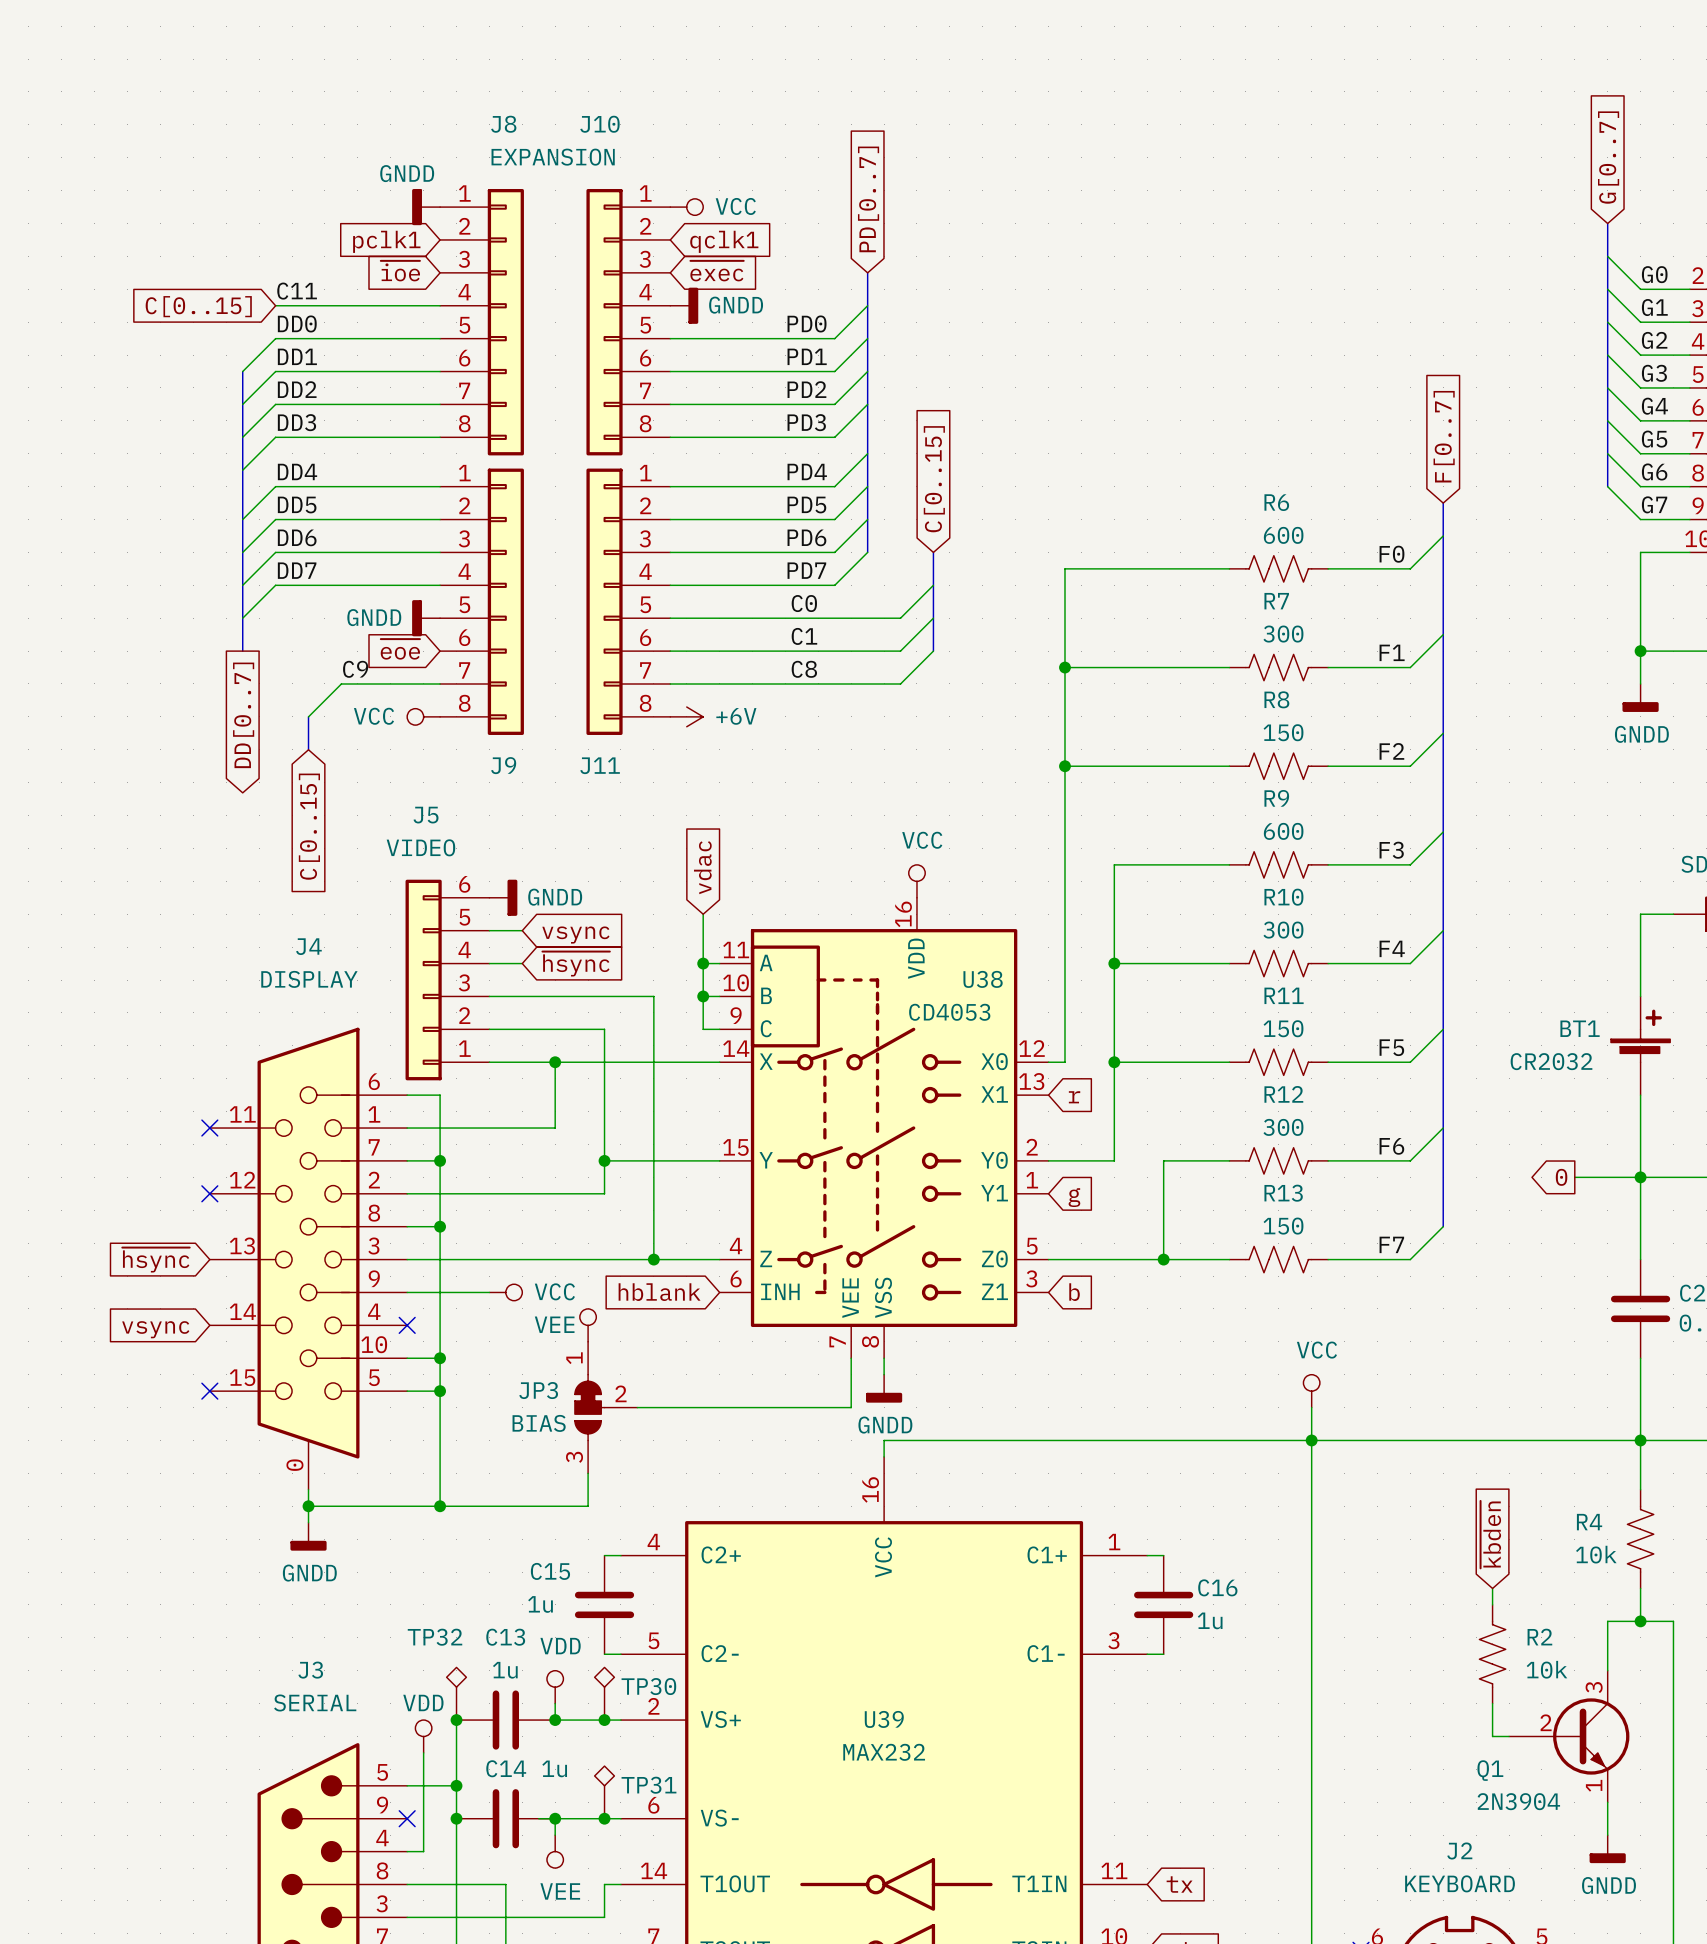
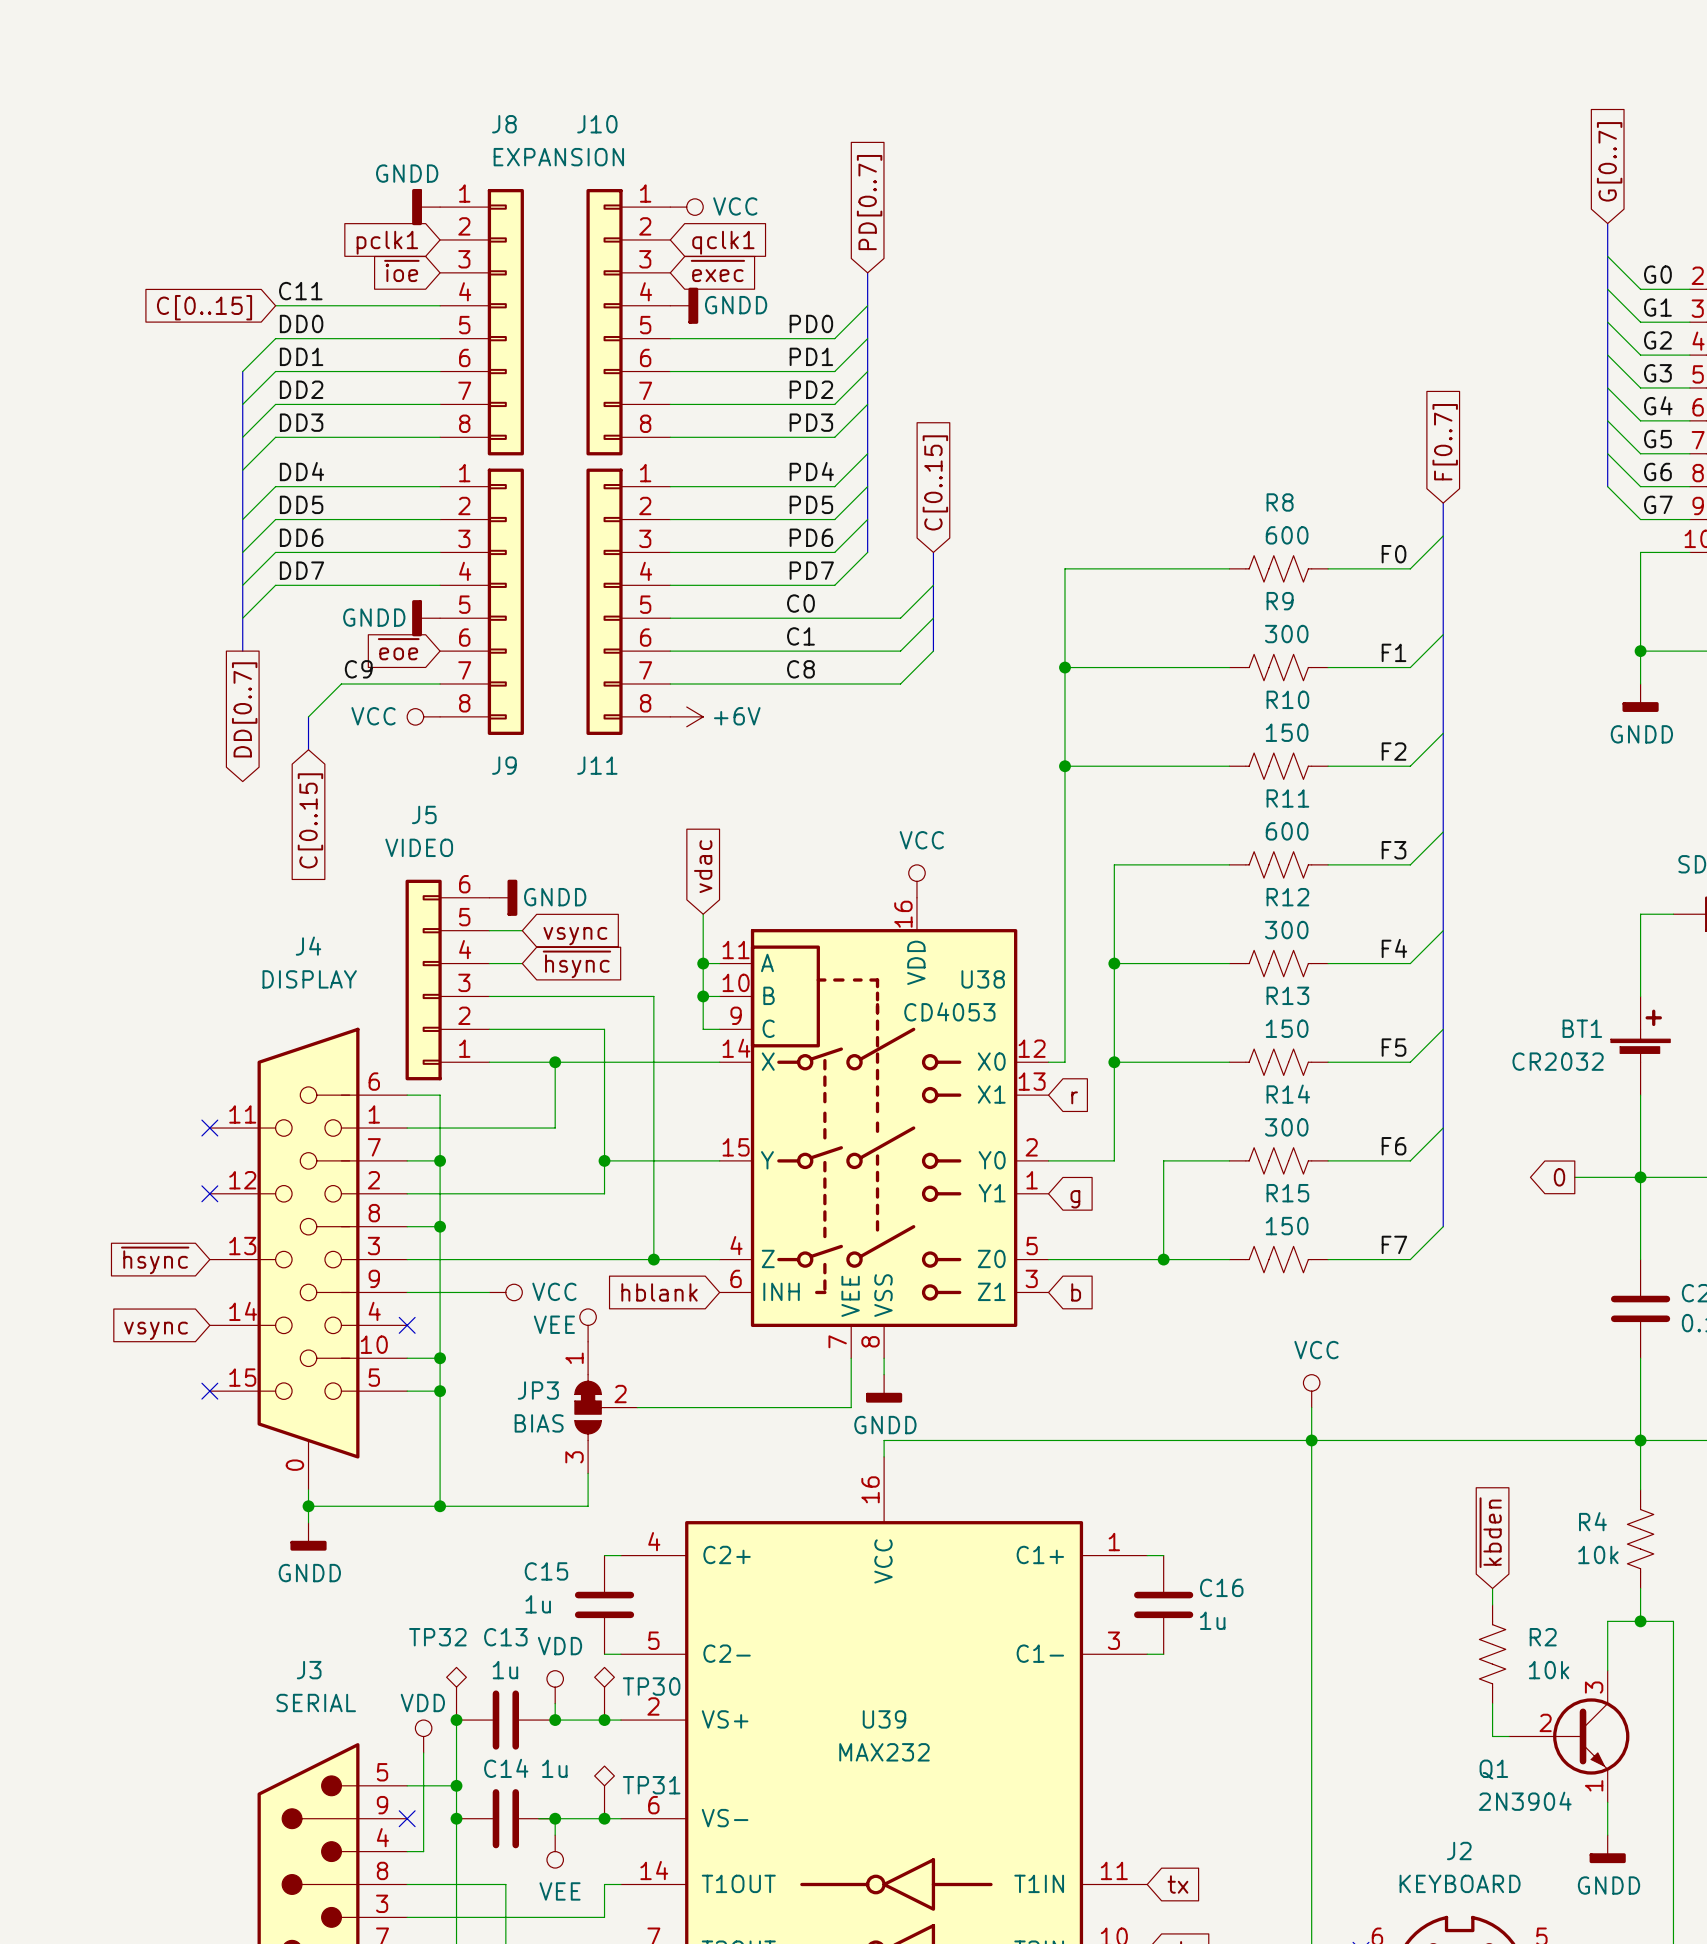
R6 name: R6 (1276, 502) -> R8 (1280, 502)
R7 name: R7 (1276, 601) -> R9 (1280, 601)
R8 name: R8 (1276, 699) -> R10 (1287, 699)
R9 name: R9 (1276, 798) -> R11 (1287, 798)
R10 name: R10 (1283, 897) -> R12 (1287, 897)
R11 name: R11 (1284, 995) -> R13 (1287, 995)
R12 name: R12 (1283, 1094) -> R14 (1288, 1094)
R13 name: R13 (1283, 1193) -> R15 (1287, 1193)

